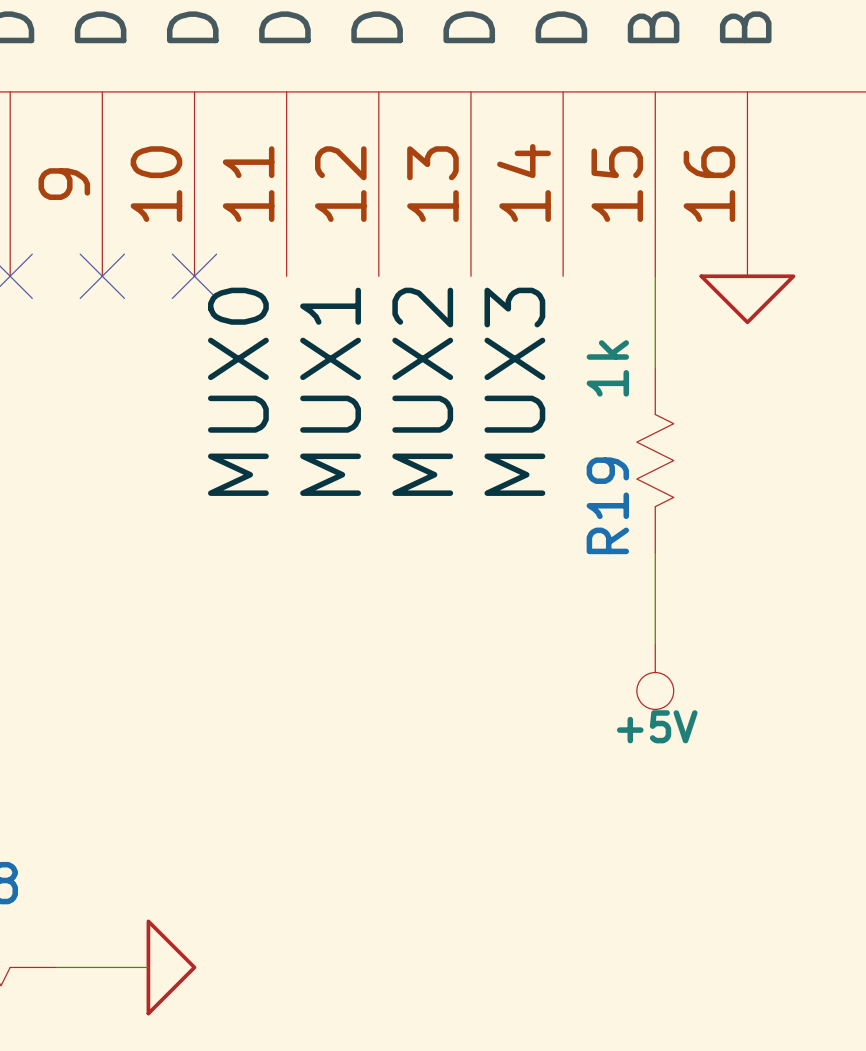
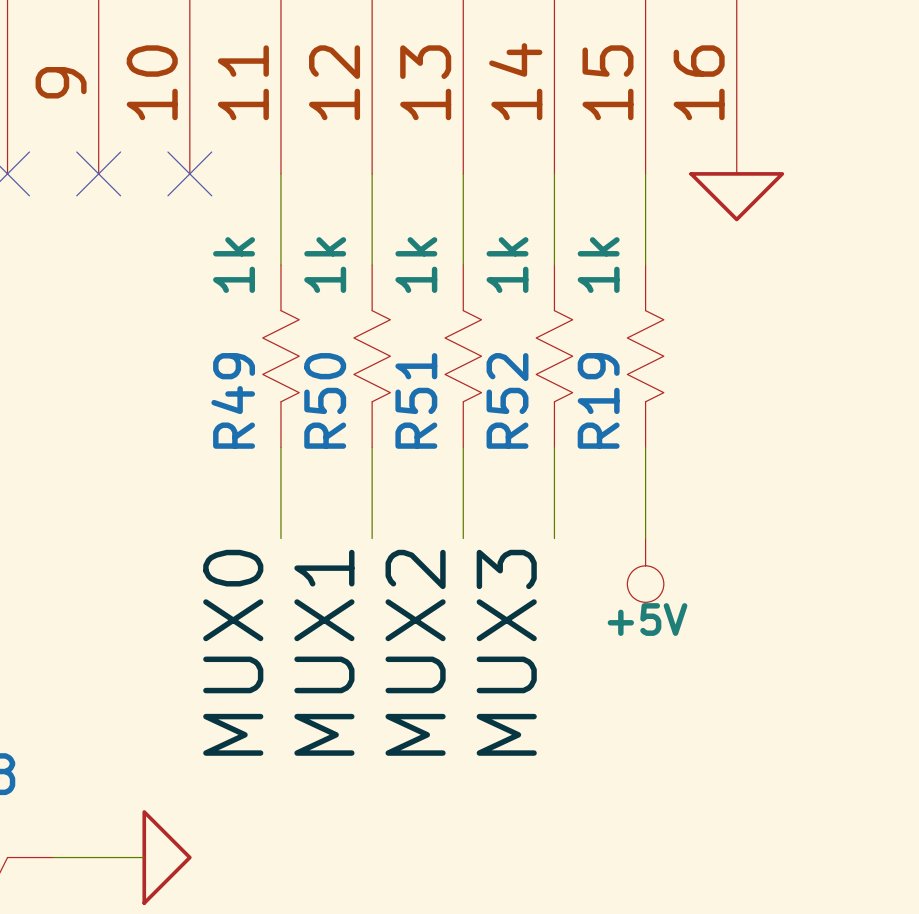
wire: none -> (280, 173) (280, 265)
wire: none -> (372, 173) (372, 265)
wire: none -> (463, 173) (463, 265)
wire: none -> (554, 173) (554, 265)
label position: MUX0 (238, 391) -> MUX0 (233, 652)
label position: MUX1 (330, 391) -> MUX1 (324, 652)
label position: MUX2 (422, 391) -> MUX2 (415, 652)
label position: MUX3 (514, 391) -> MUX3 (506, 652)
R49: none -> 1k (280, 356)
R50: none -> 1k (372, 356)
R51: none -> 1k (463, 356)
R52: none -> 1k (554, 356)
wire: none -> (280, 447) (280, 538)
wire: none -> (372, 447) (372, 538)
wire: none -> (463, 447) (463, 538)
wire: none -> (554, 447) (554, 538)

